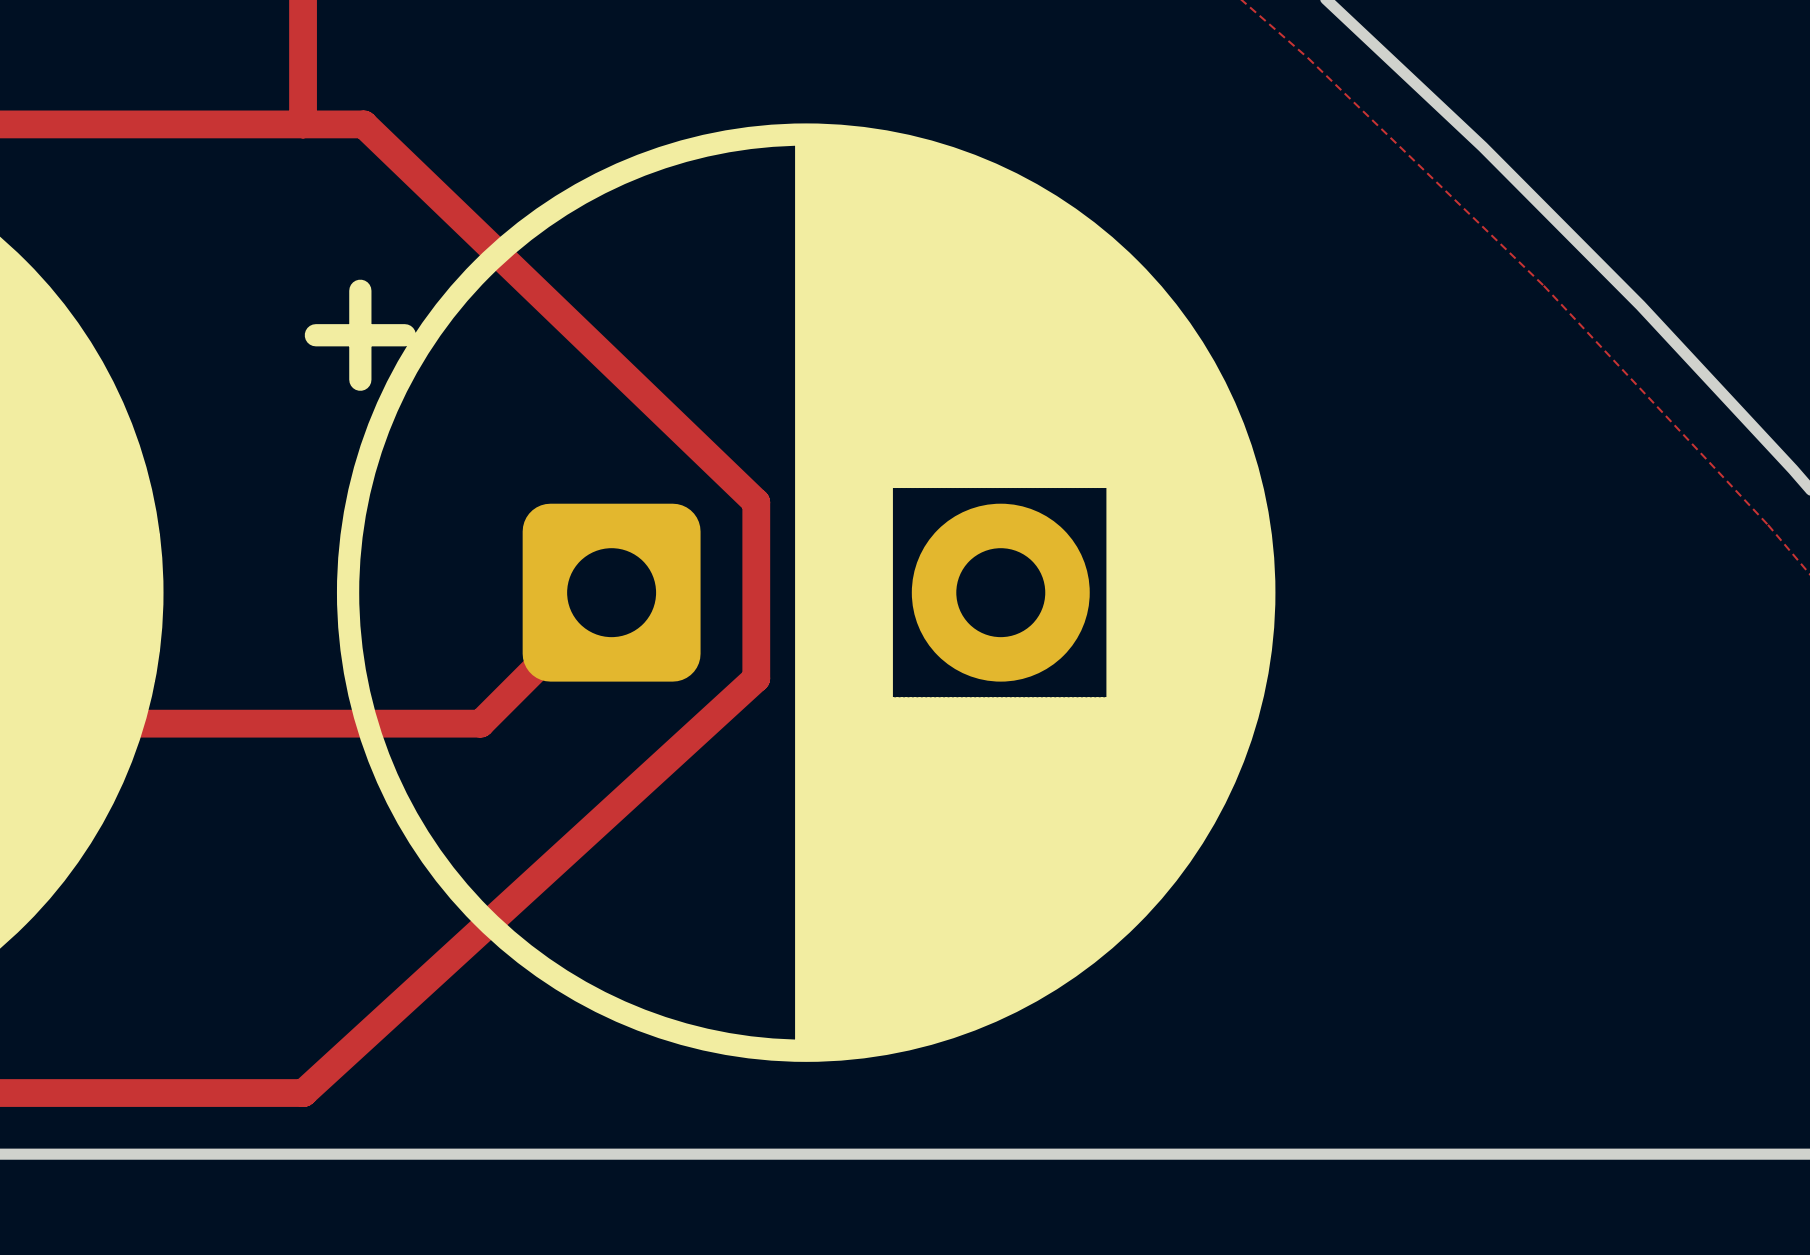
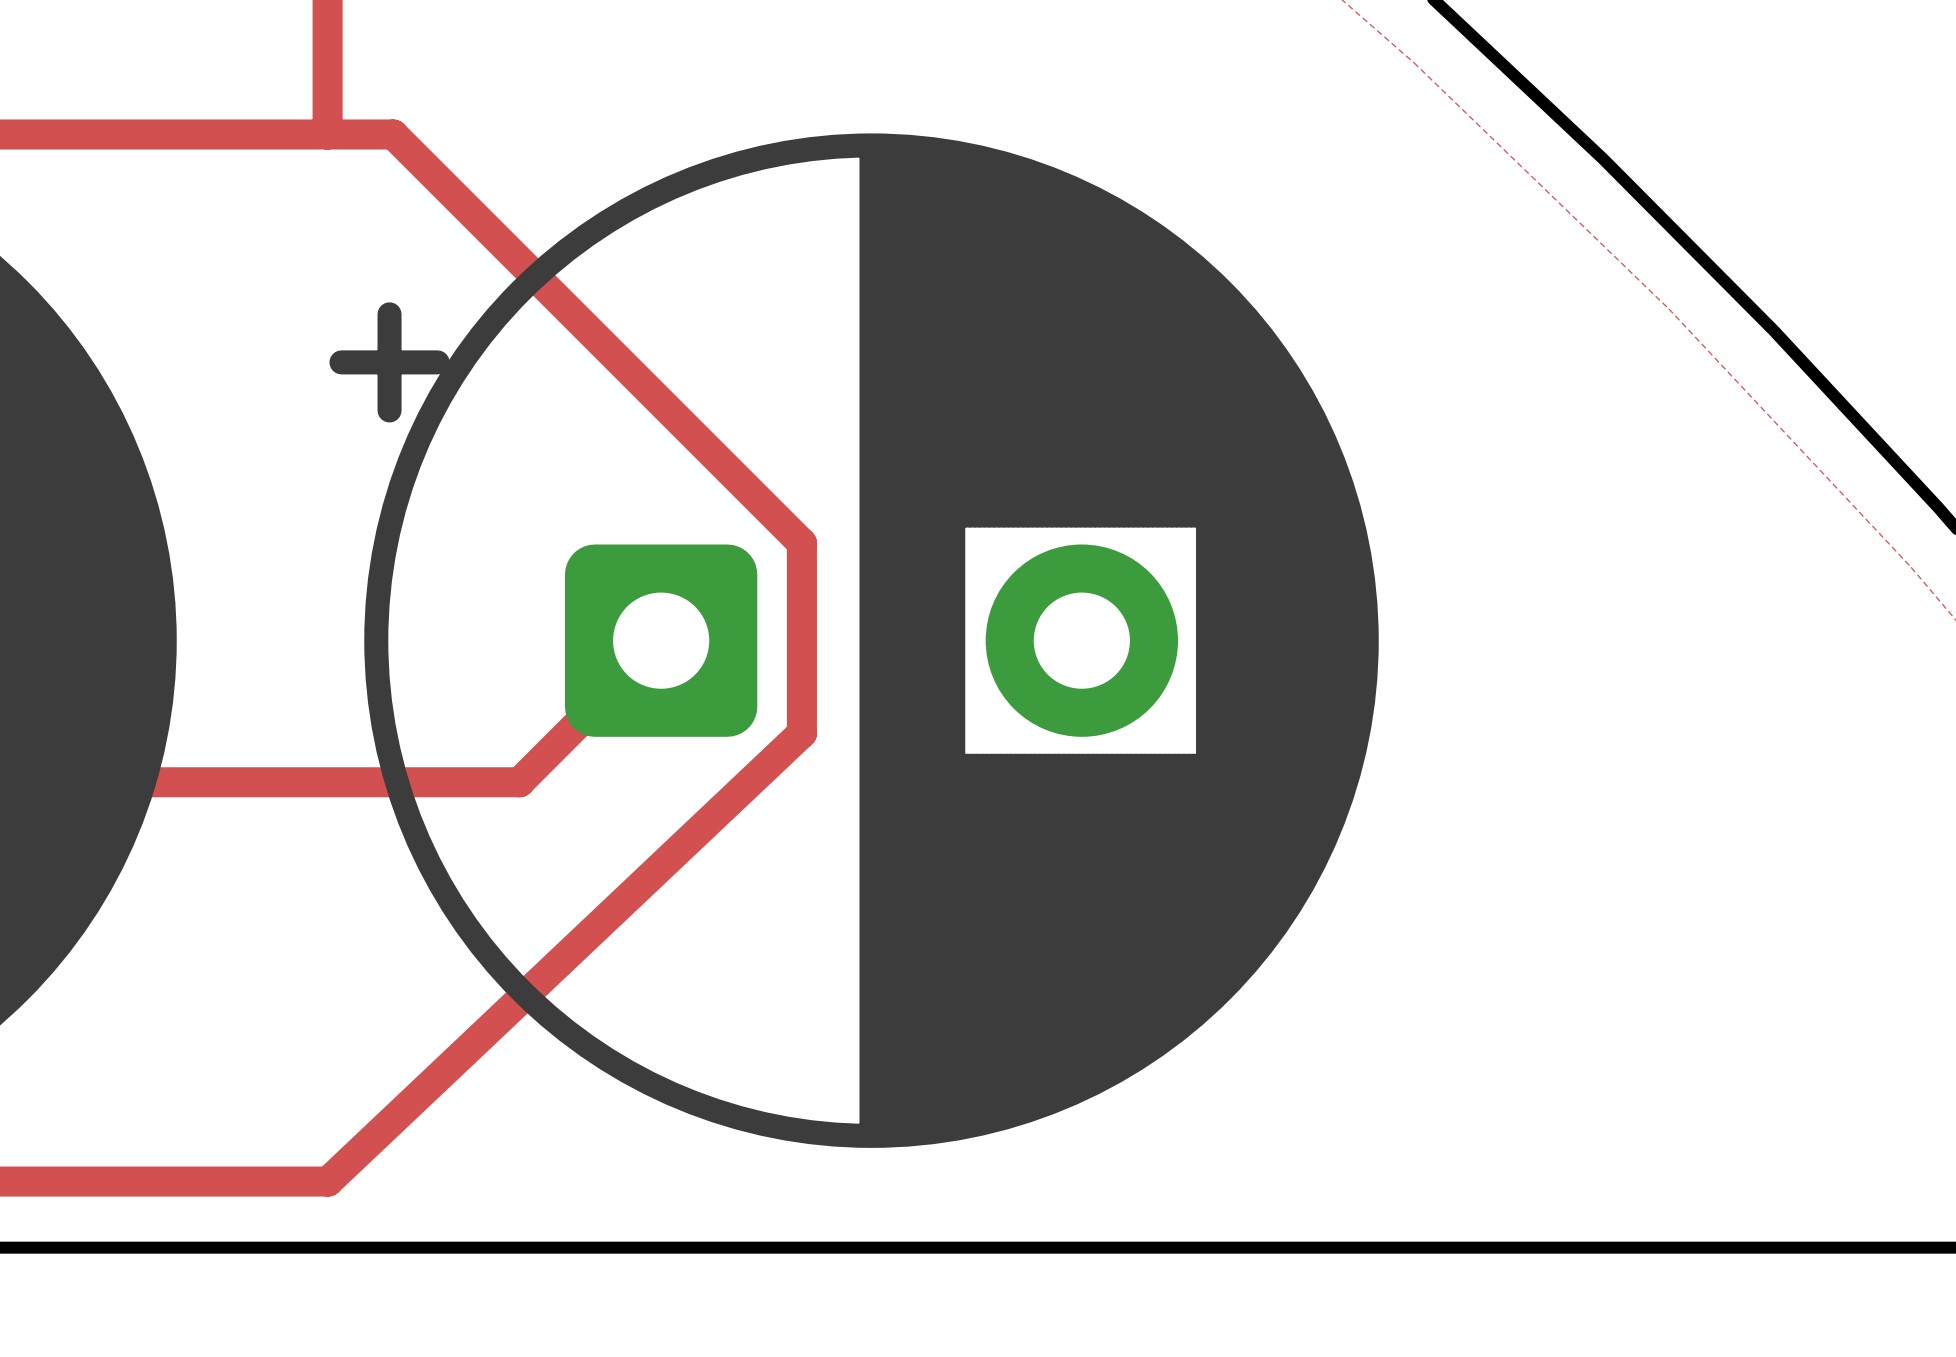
track: (363, 124) (756, 502) (756, 678) (303, 1093) -> (393, 134) (801, 543) (801, 733) (328, 1181)

